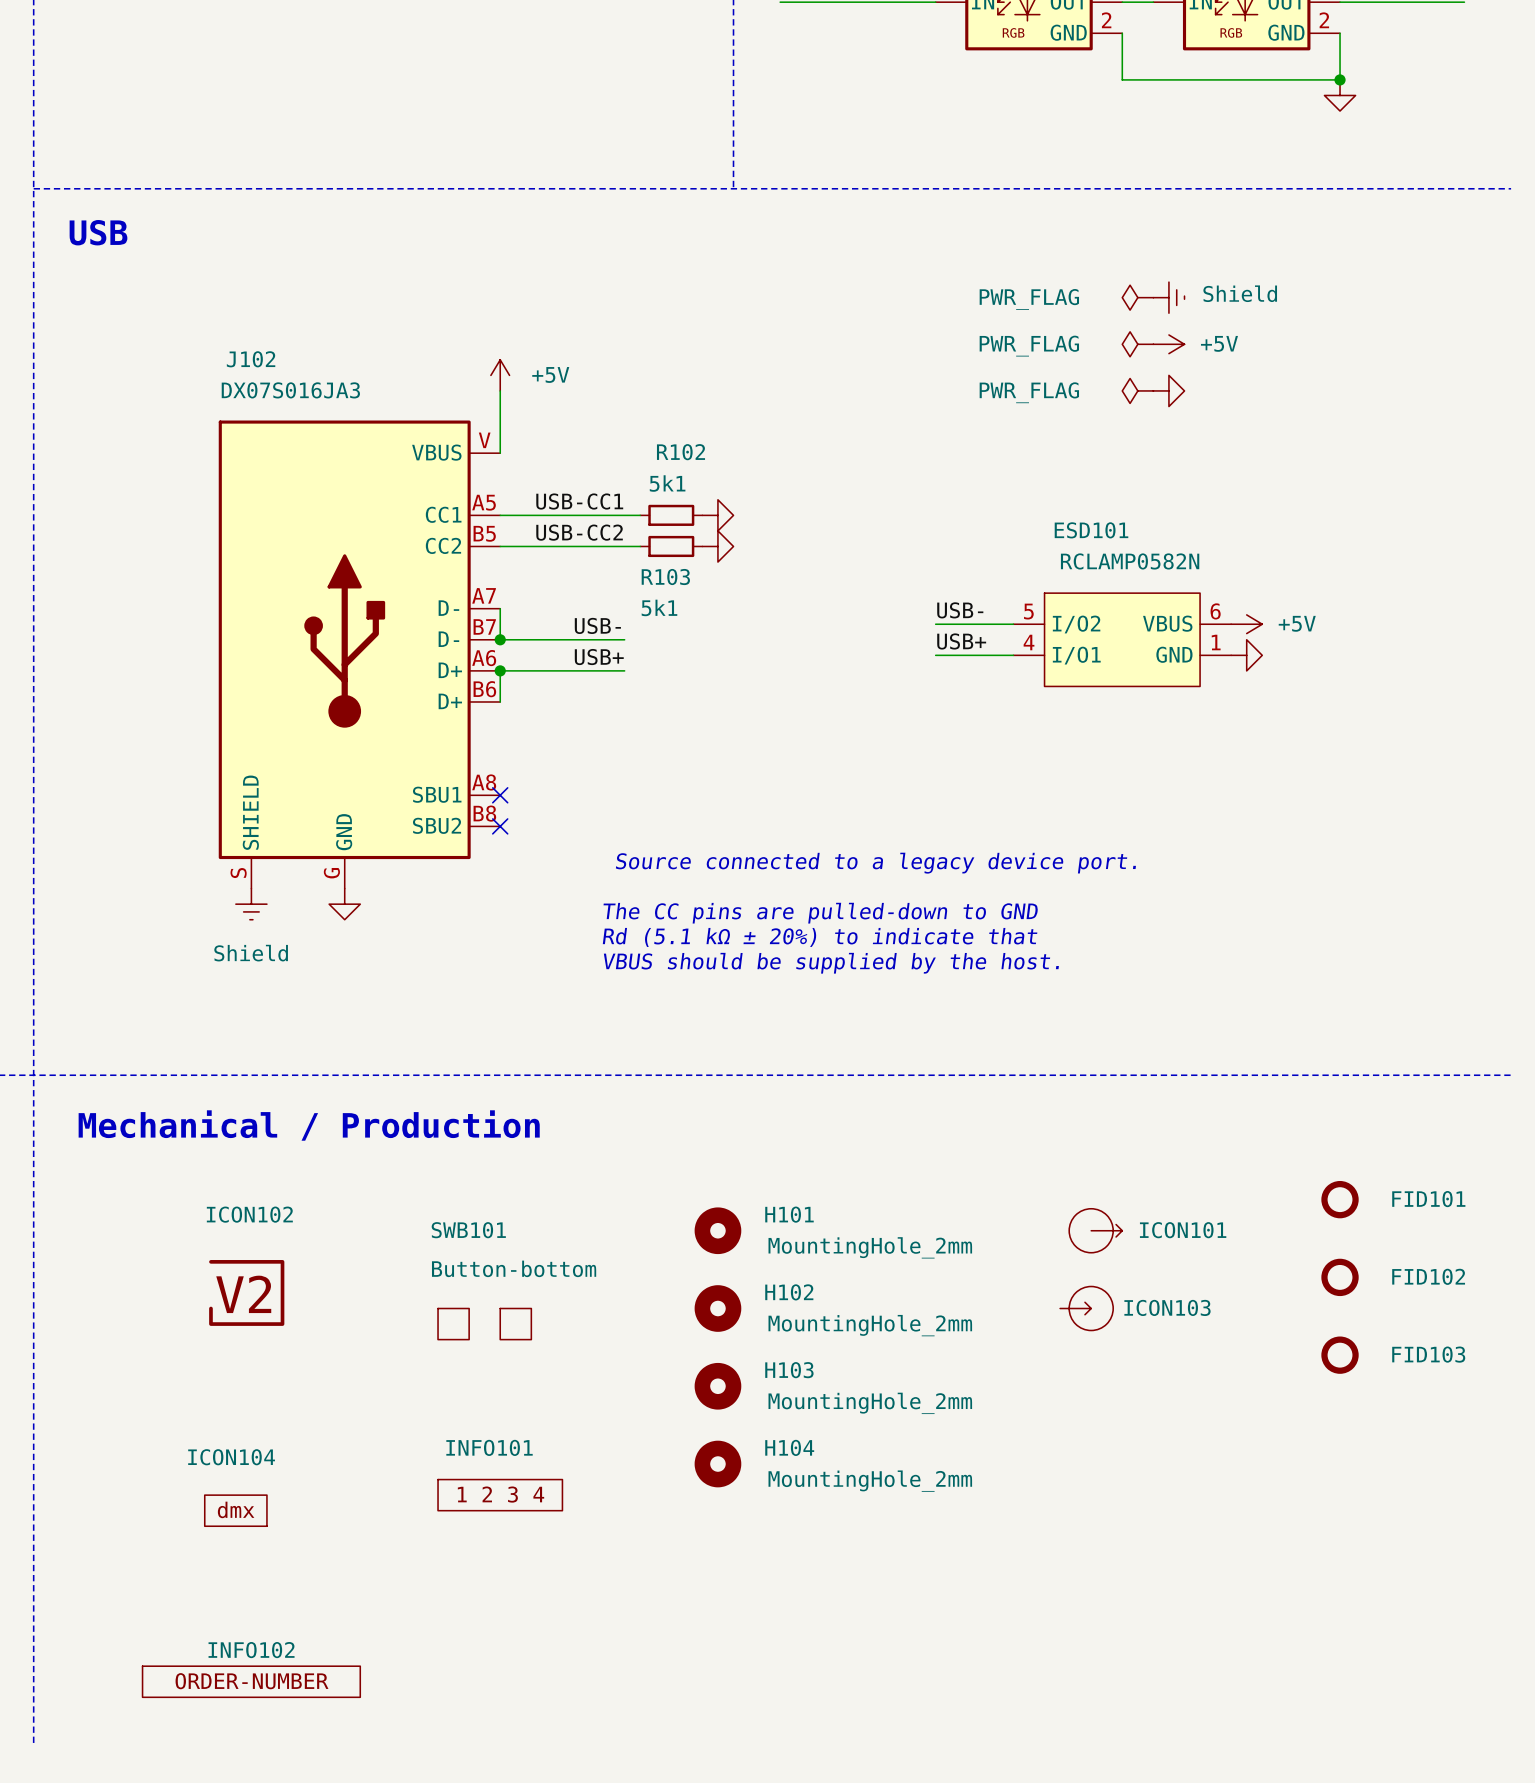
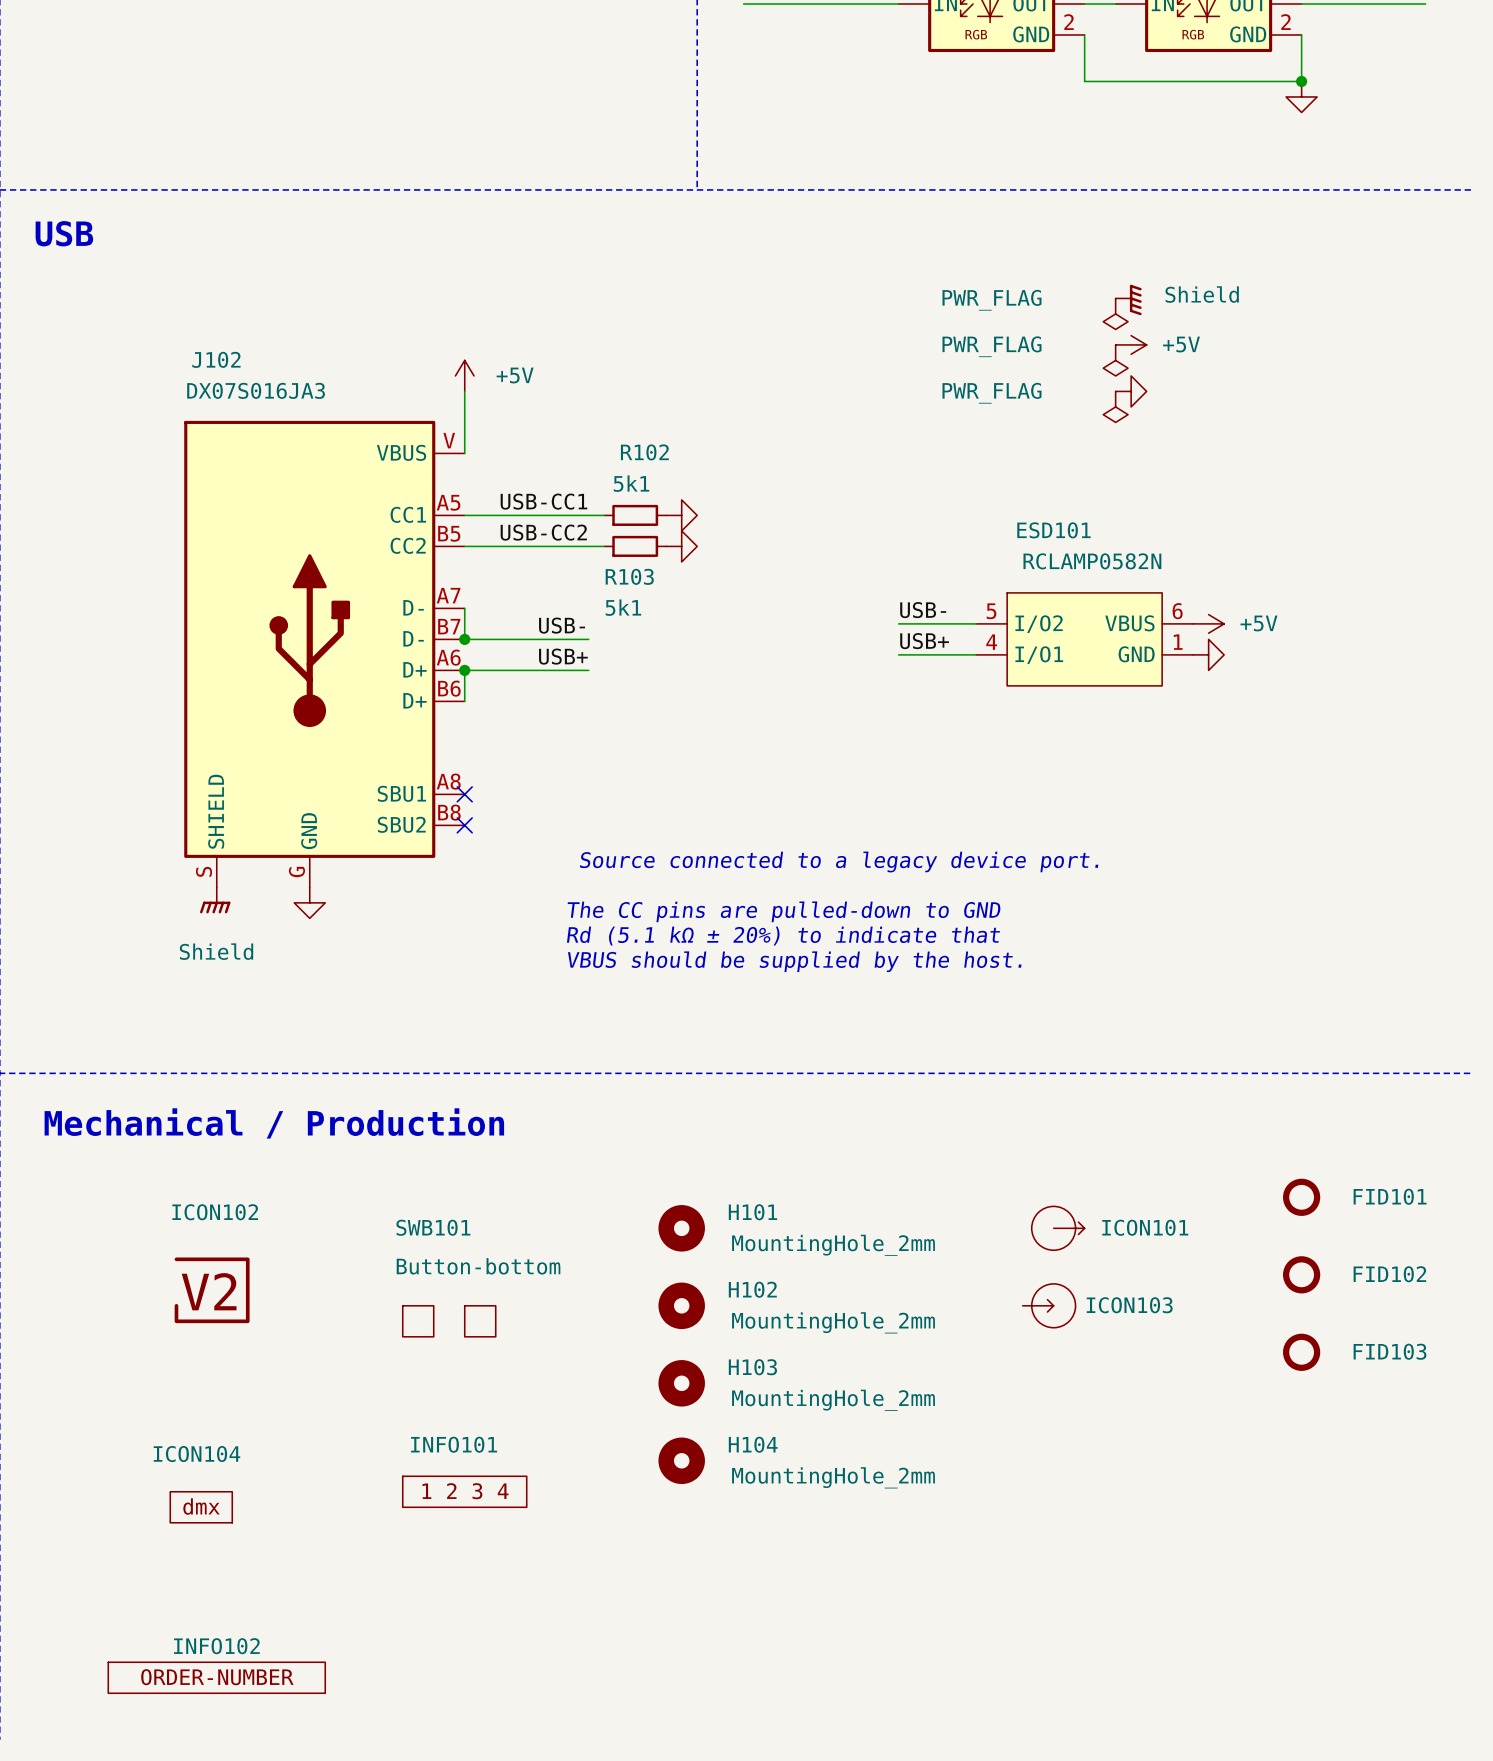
power symbol shape: [1153, 282, 1185, 314] -> [1115, 284, 1142, 316]
power symbol: PWR_FLAG (1137, 297) -> none
power symbol: none -> PWR_FLAG (1115, 313)
power symbol: PWR_FLAG (1137, 344) -> none
power symbol: none -> PWR_FLAG (1115, 360)
power symbol: PWR_FLAG (1137, 390) -> none
power symbol: none -> PWR_FLAG (1115, 406)
power symbol shape: [235, 888, 267, 920] -> [200, 887, 231, 914]

